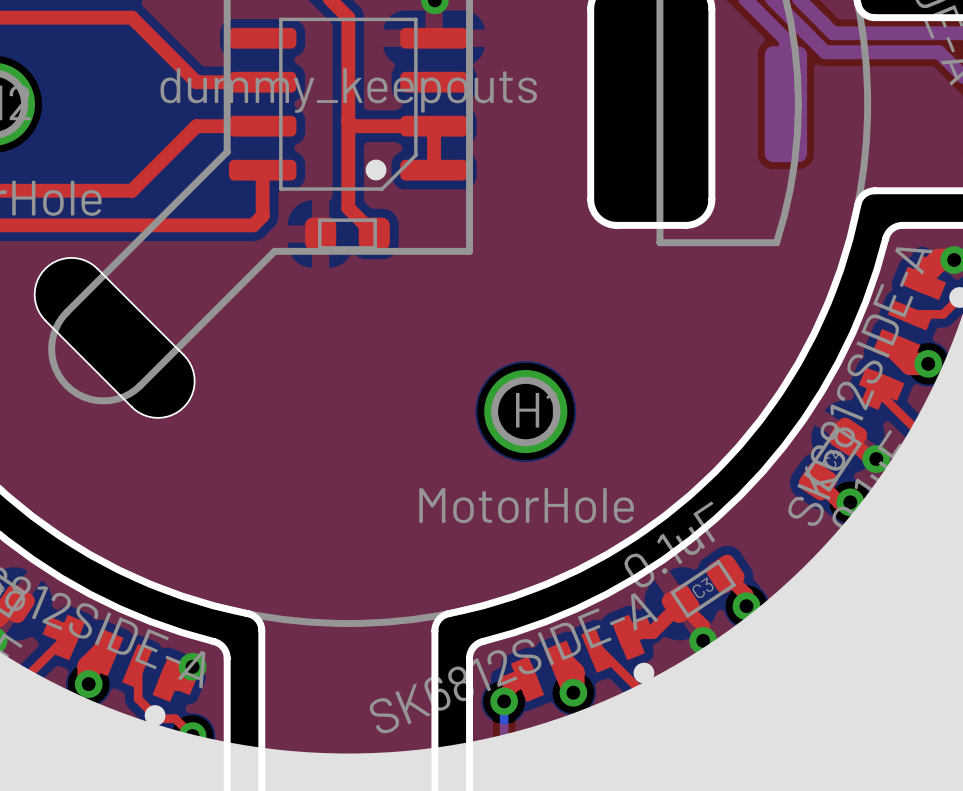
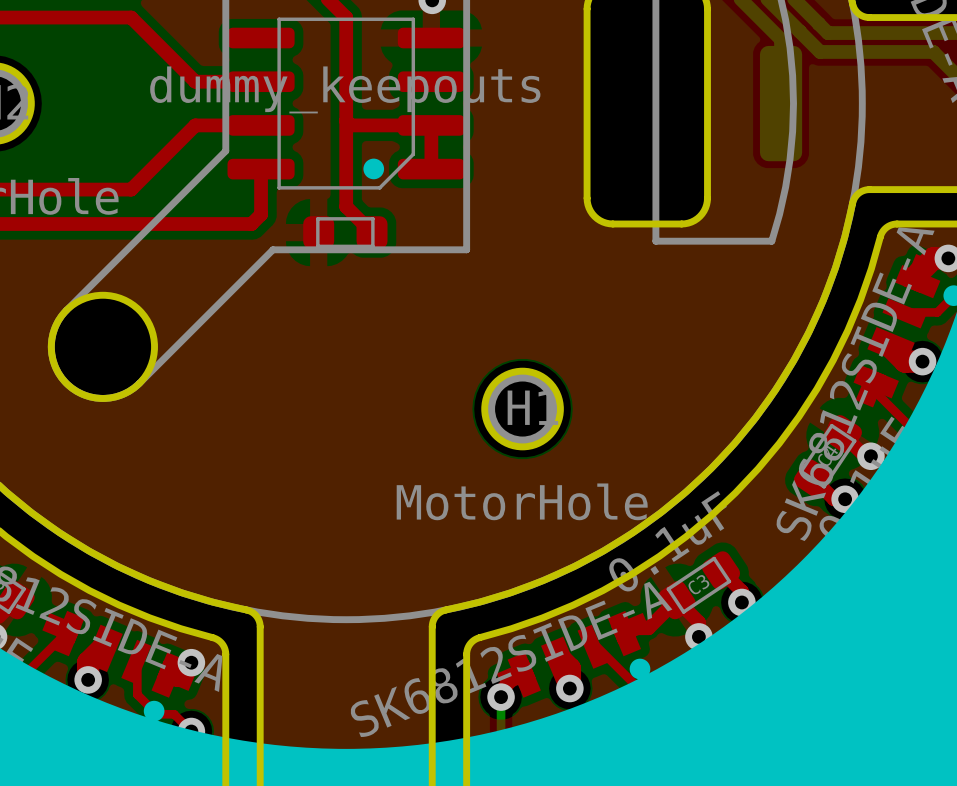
board edge: (97, 268) (189, 362) (194, 376) (193, 390) (187, 403) (176, 412) (162, 417) (153, 417) (135, 410) (39, 312) (34, 299) (34, 289) (39, 276) (49, 265) (61, 259) (76, 258) (89, 262) (97, 268) -> none
round board edge: none -> [47, 291, 158, 402]

